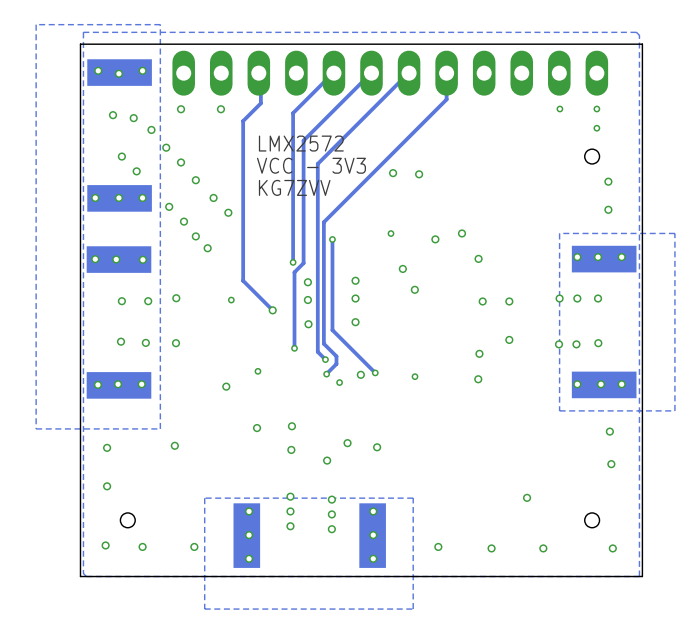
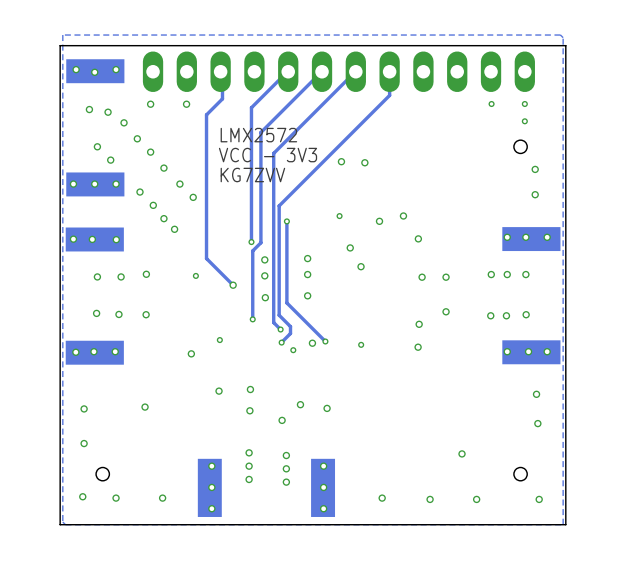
zone outline: (160, 24) (36, 24) (36, 428) (160, 428) (160, 24) -> none
zone outline: (674, 233) (559, 233) (559, 410) (674, 410) (674, 233) -> none
zone outline: (413, 498) (204, 498) (204, 609) (413, 609) (413, 498) -> none

